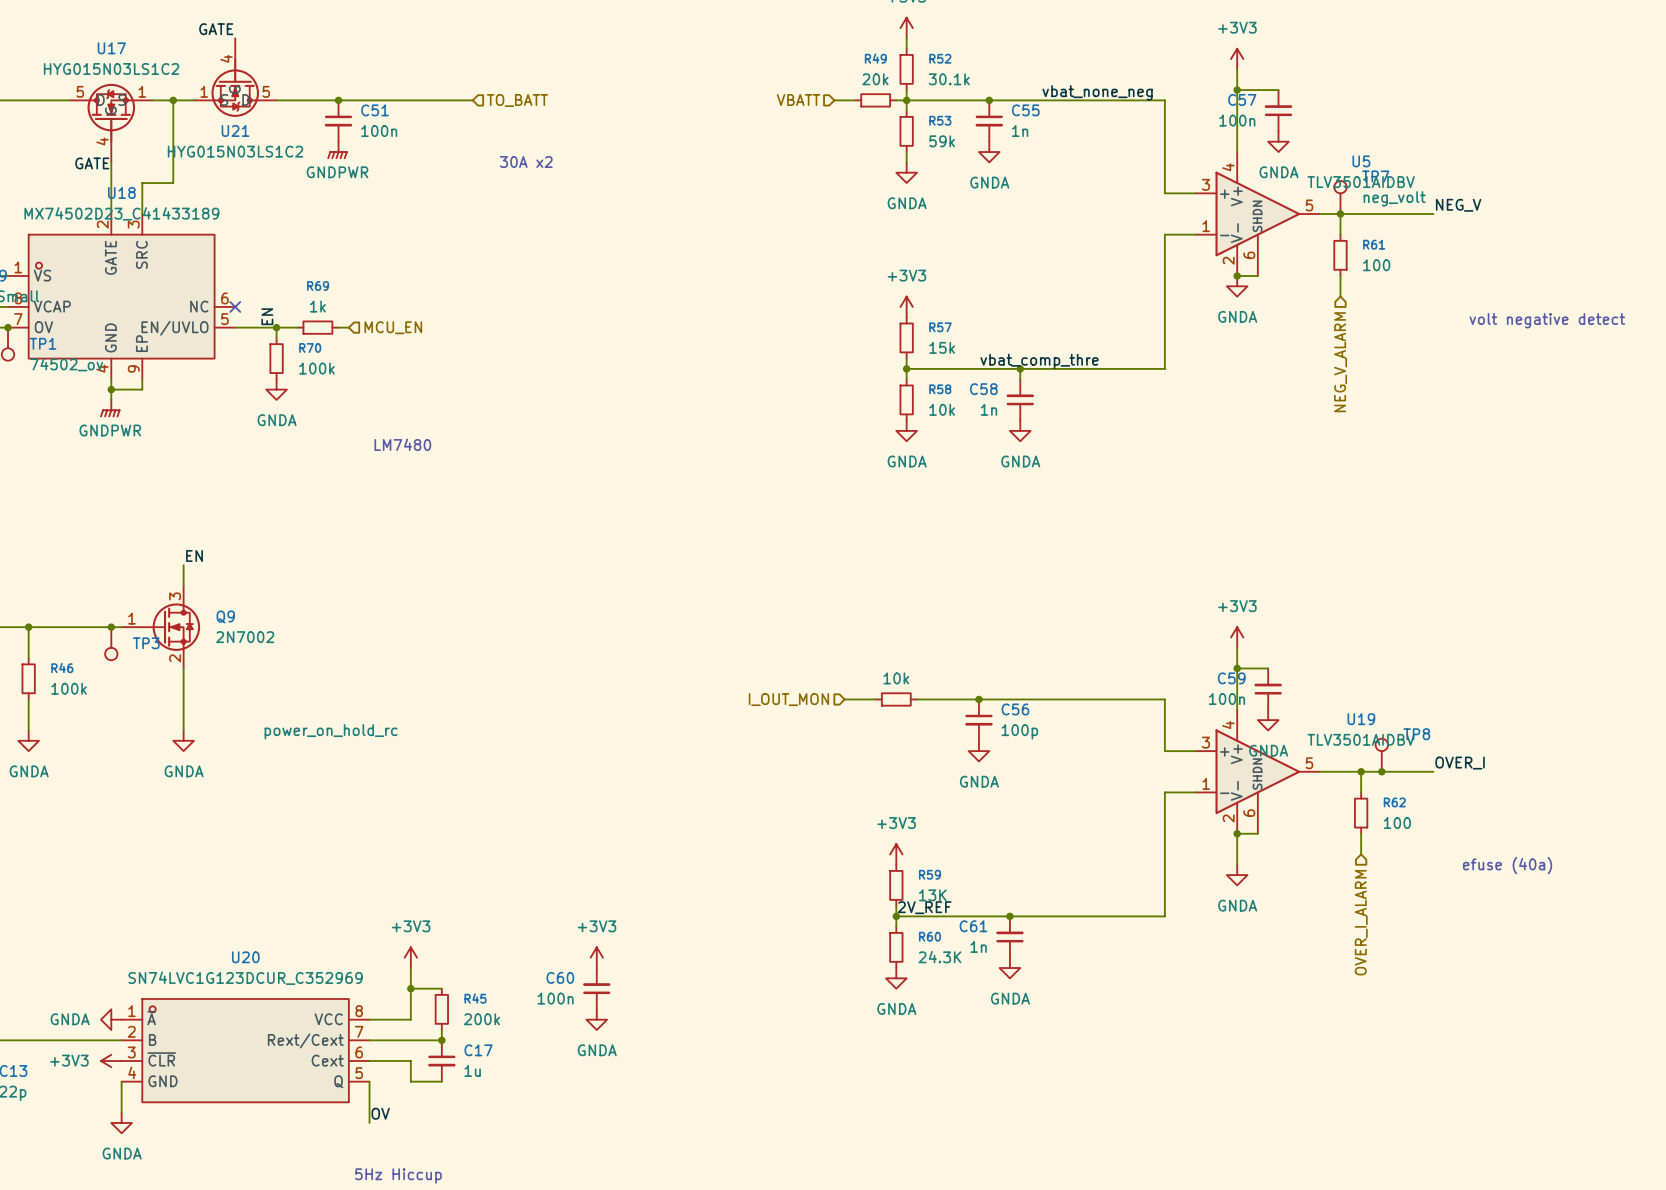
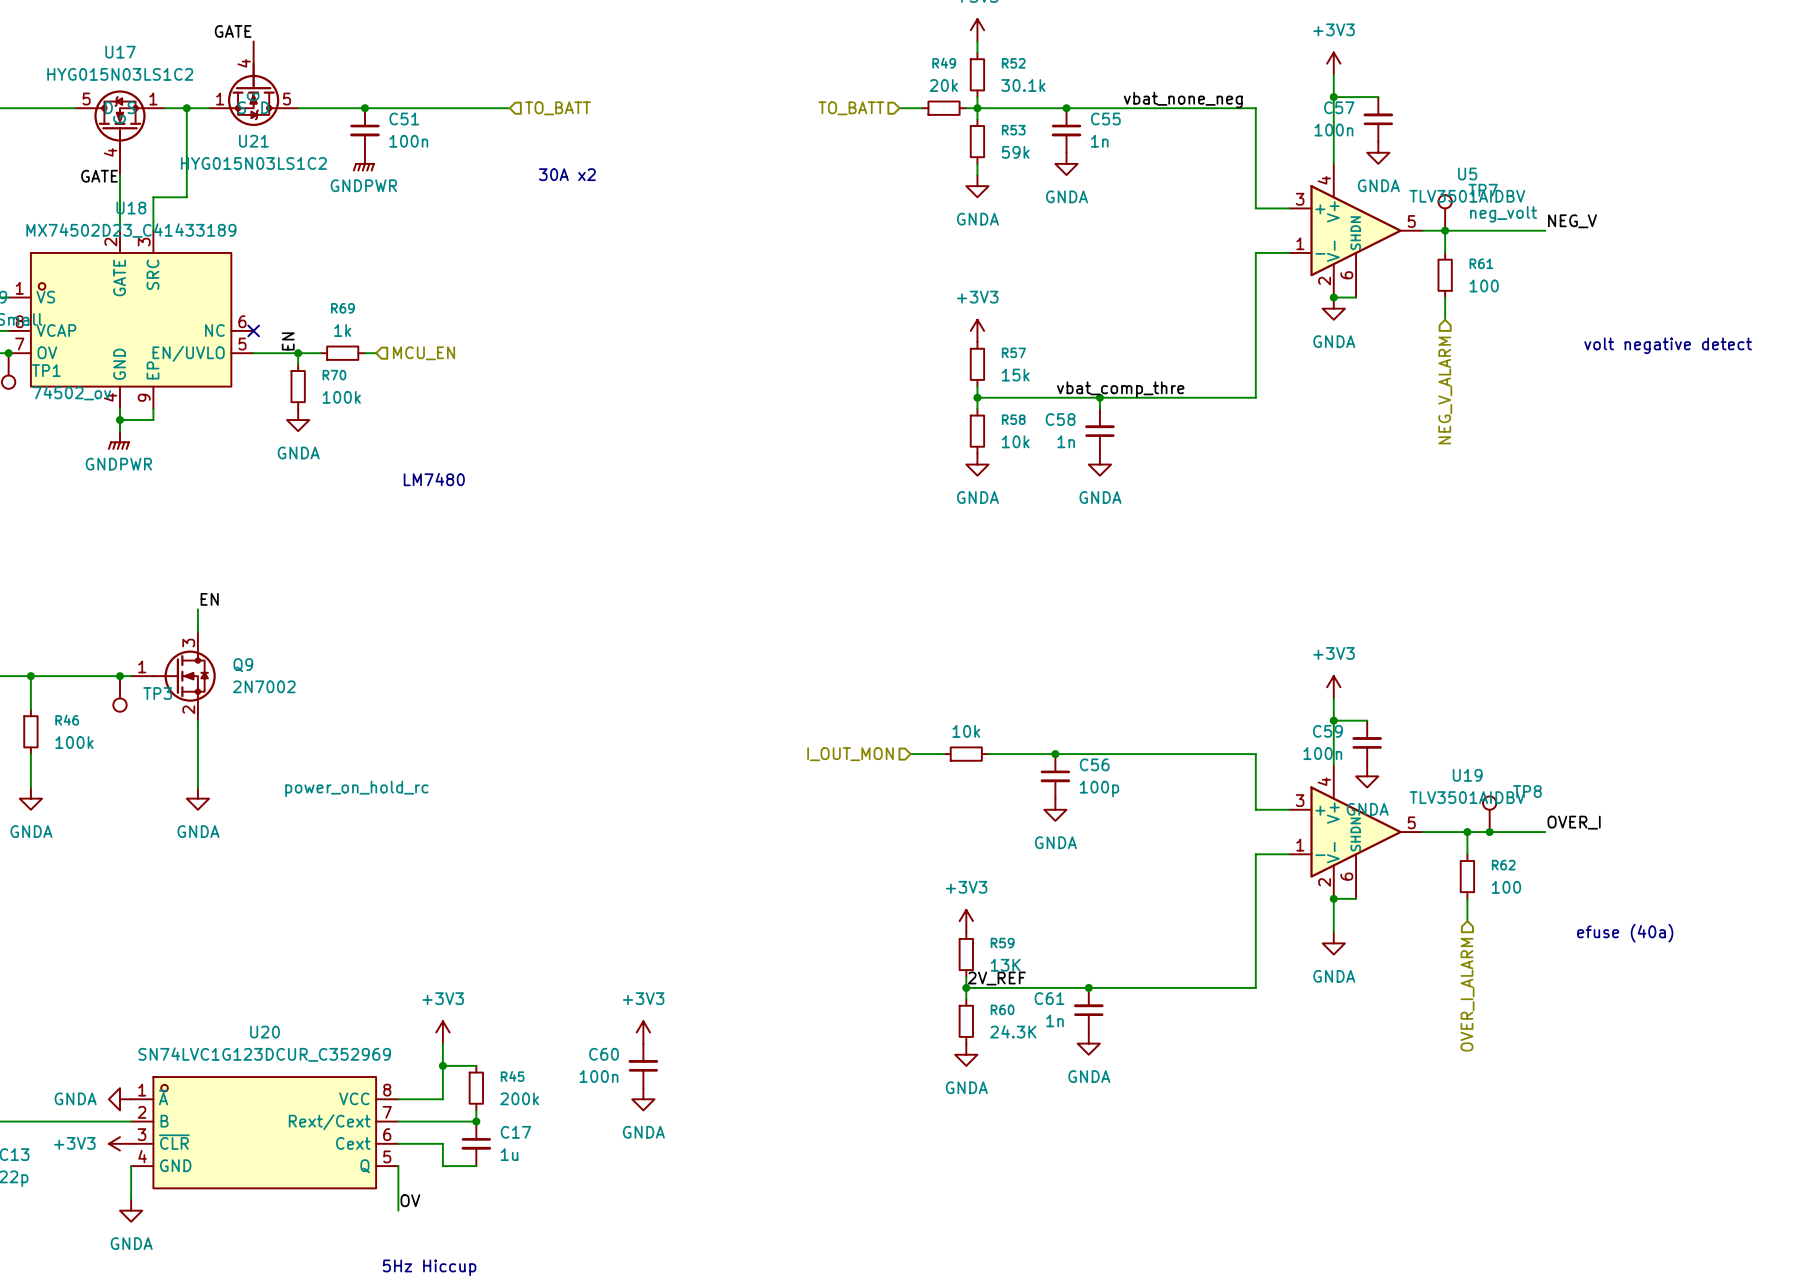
hierarchical label: VBATT (798, 99) -> TO_BATT (851, 108)

